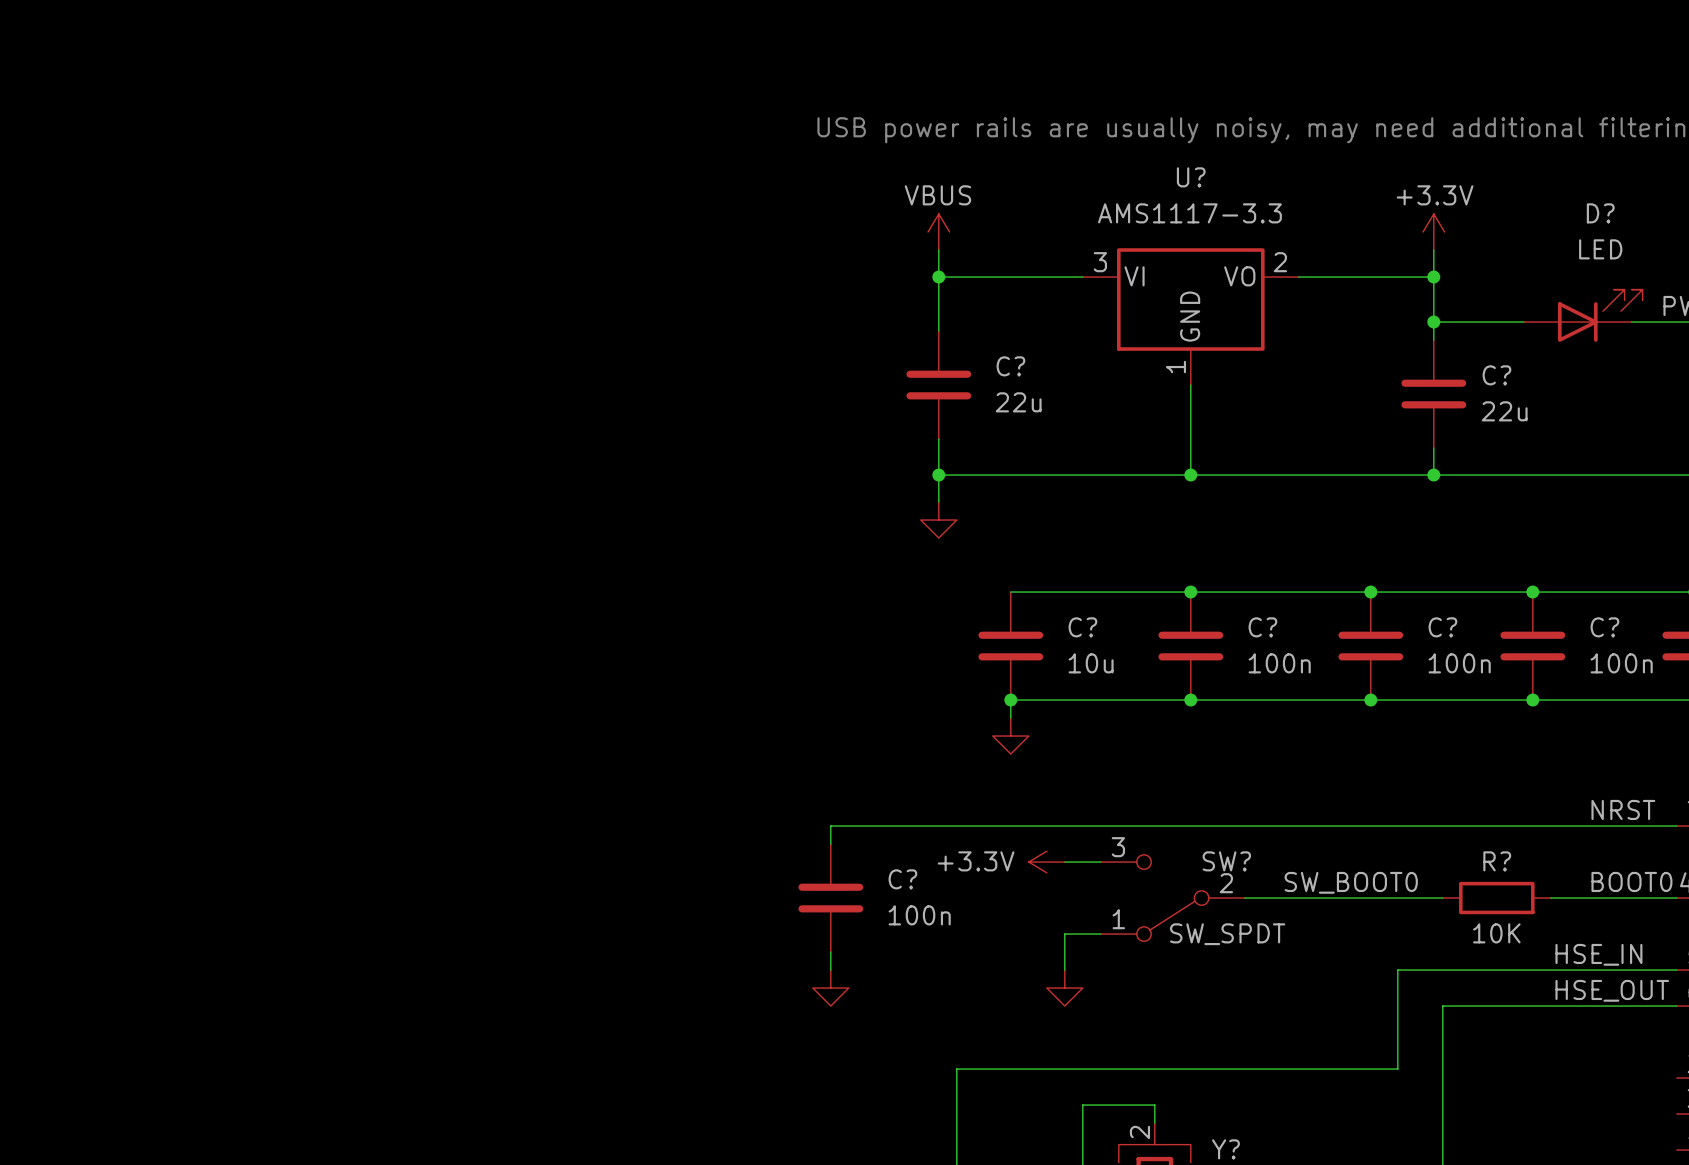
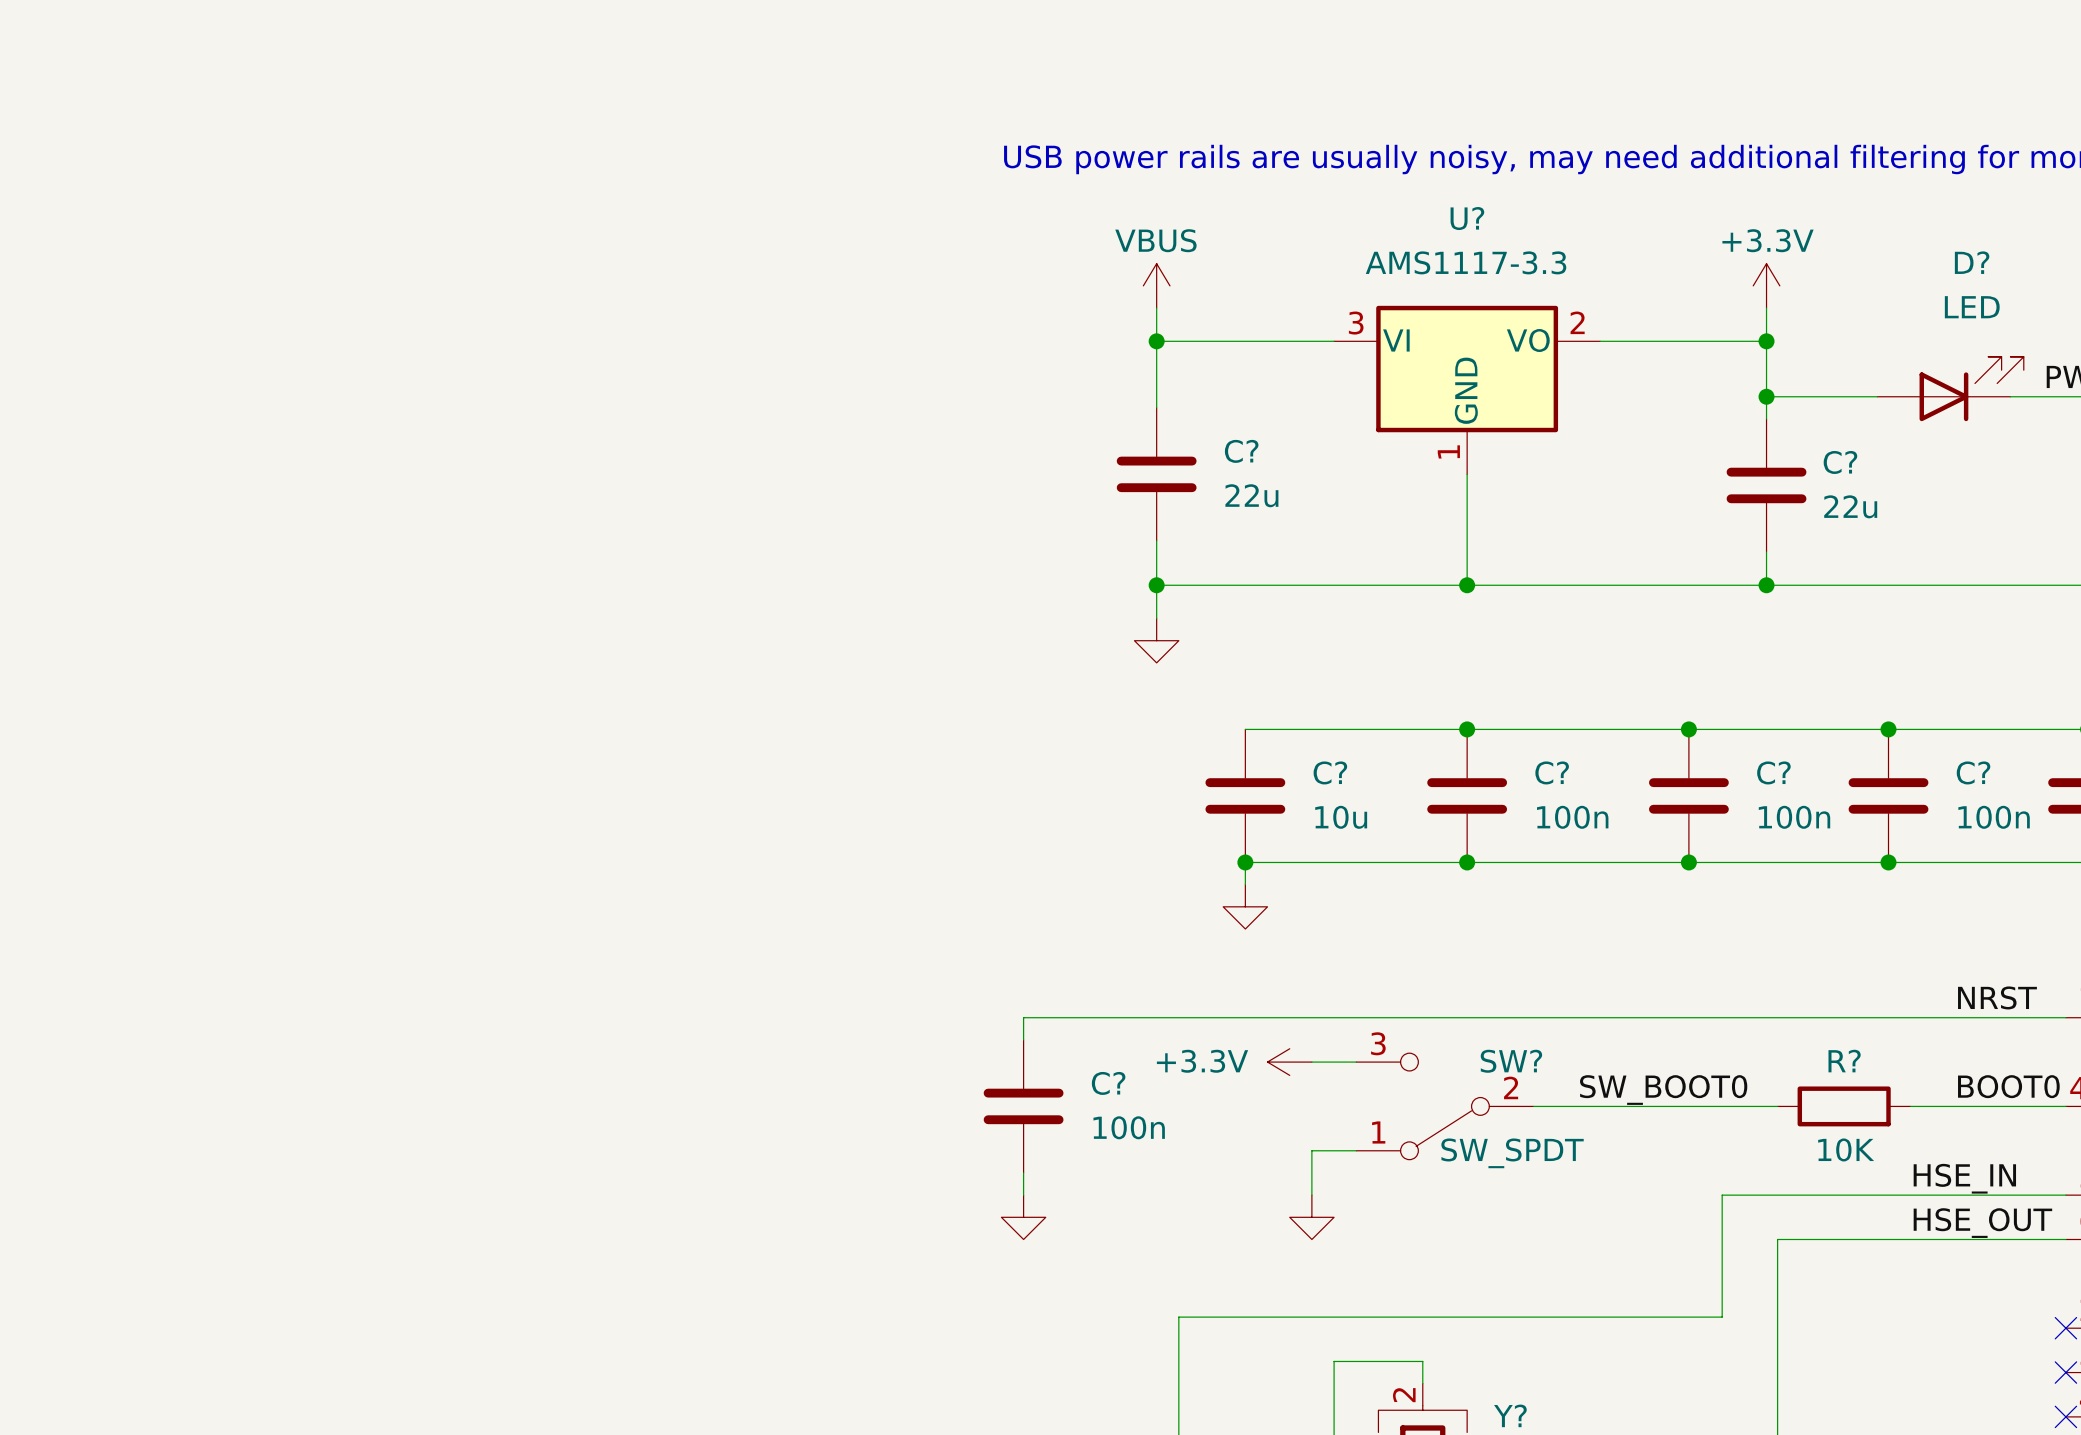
no-connect mark: none -> (2065, 1328)
no-connect mark: none -> (2065, 1372)
no-connect mark: none -> (2065, 1416)

